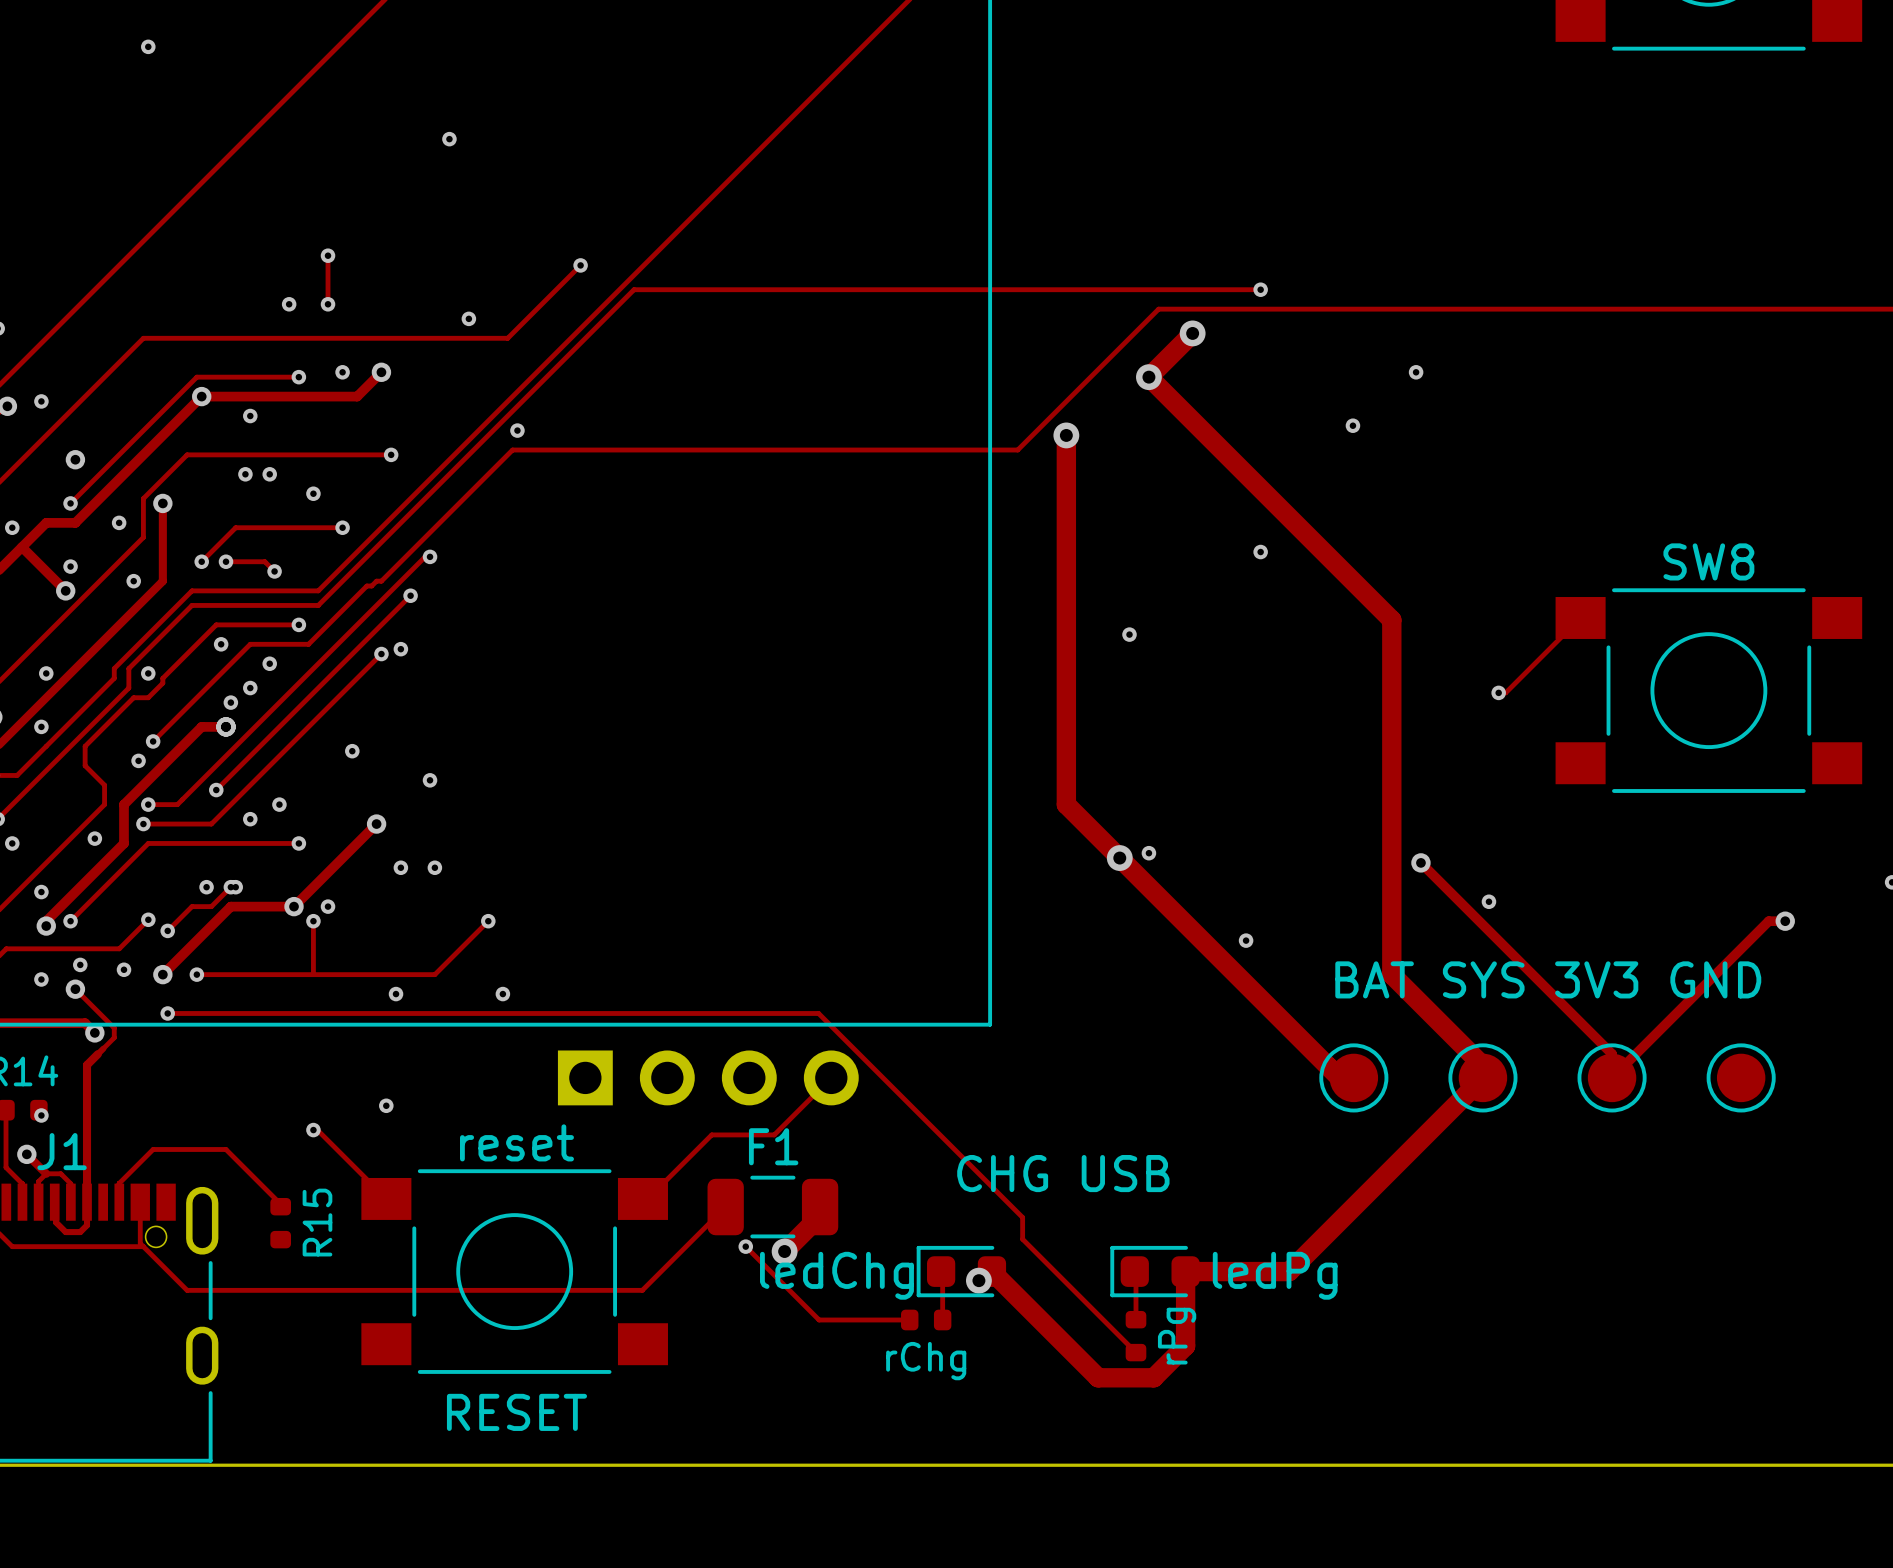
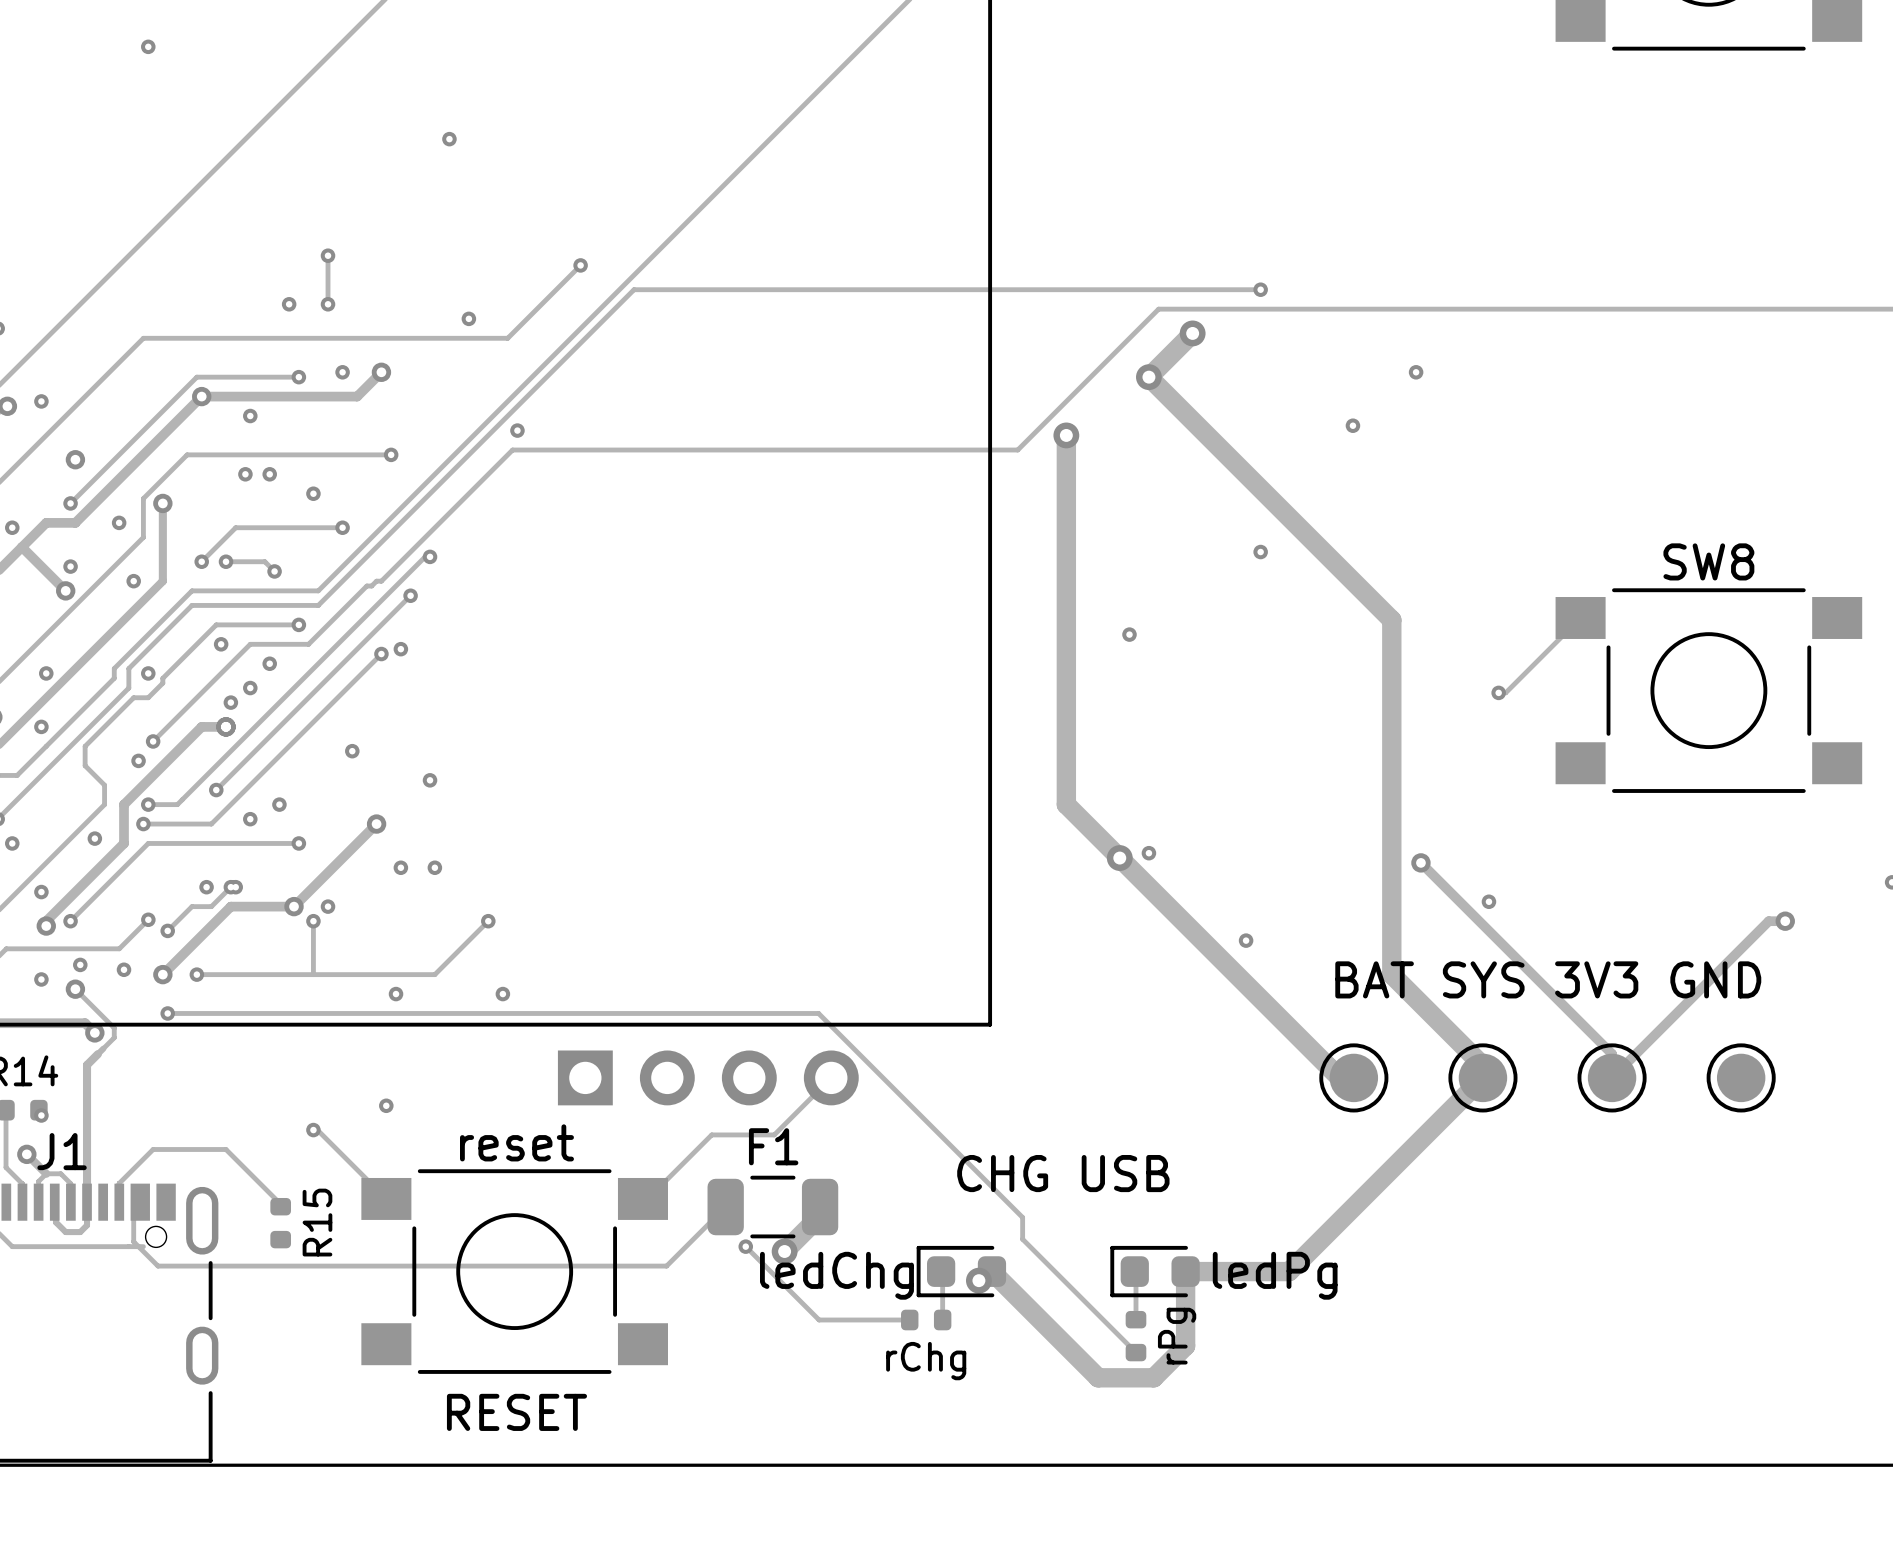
track: (140, 1202) (140, 1243) (187, 1290) (642, 1290) (666, 1266) -> (140, 1202) (133, 1208) (133, 1241) (157, 1266) (666, 1266)

